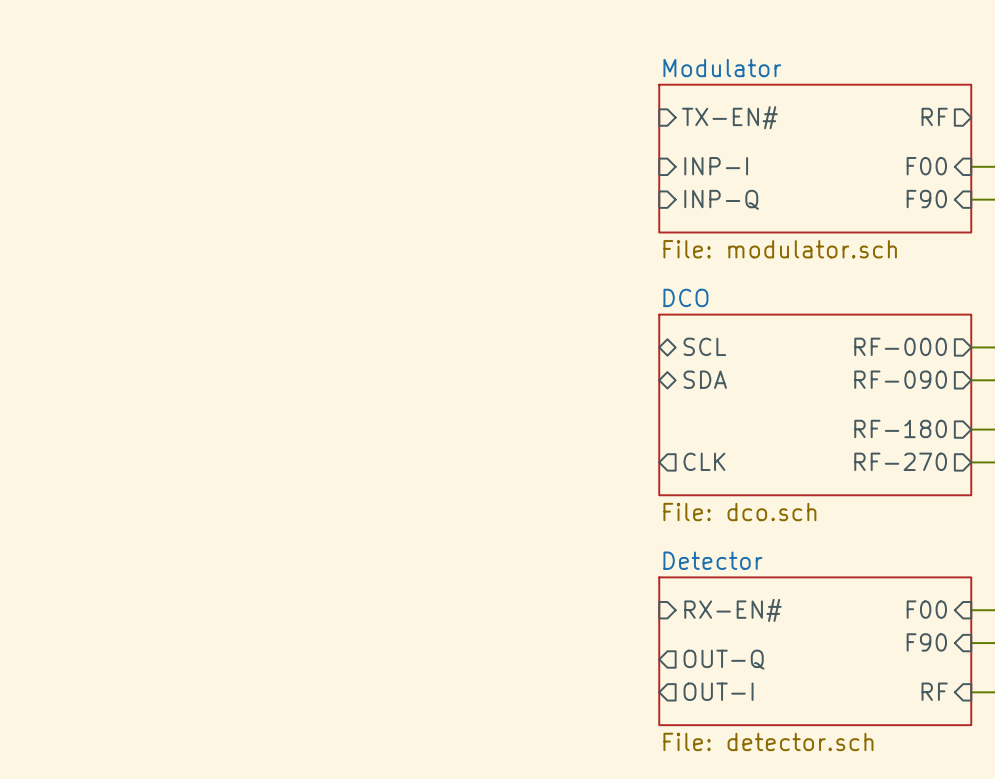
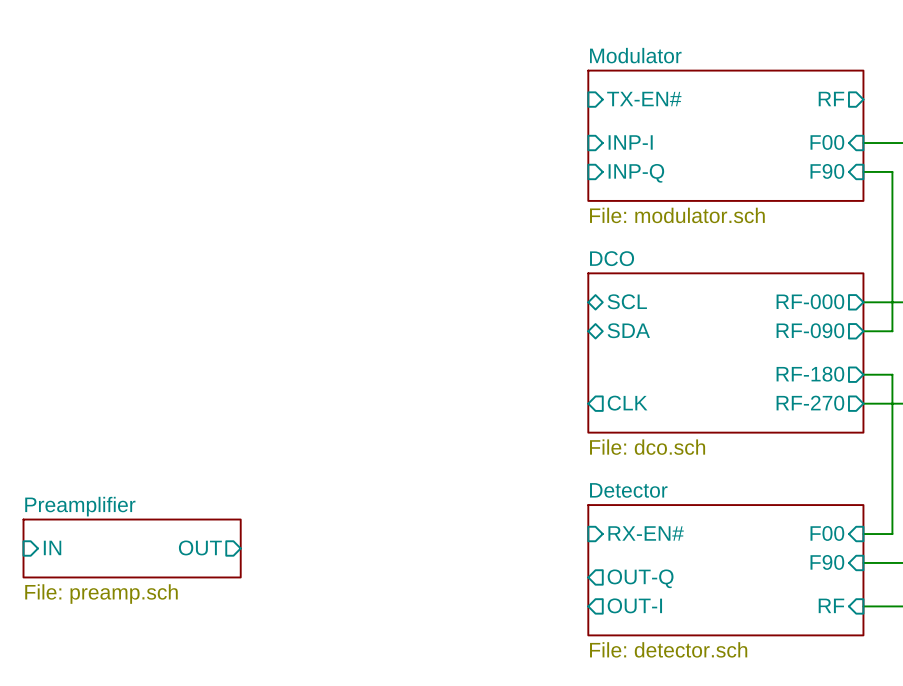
sheet pin: none -> IN (52, 547)
sheet Preamplifier: none -> File: preamp.sch (132, 548)
sheet pin: none -> OUT (200, 547)

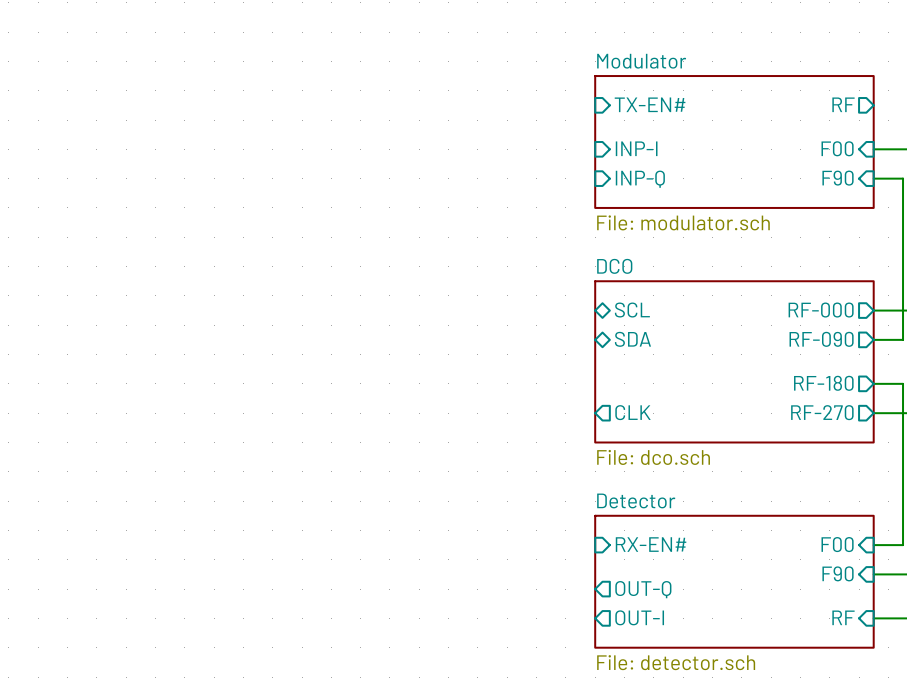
sheet pin: IN (52, 547) -> none
sheet pin: OUT (200, 547) -> none
sheet Preamplifier: File: preamp.sch (132, 548) -> none

